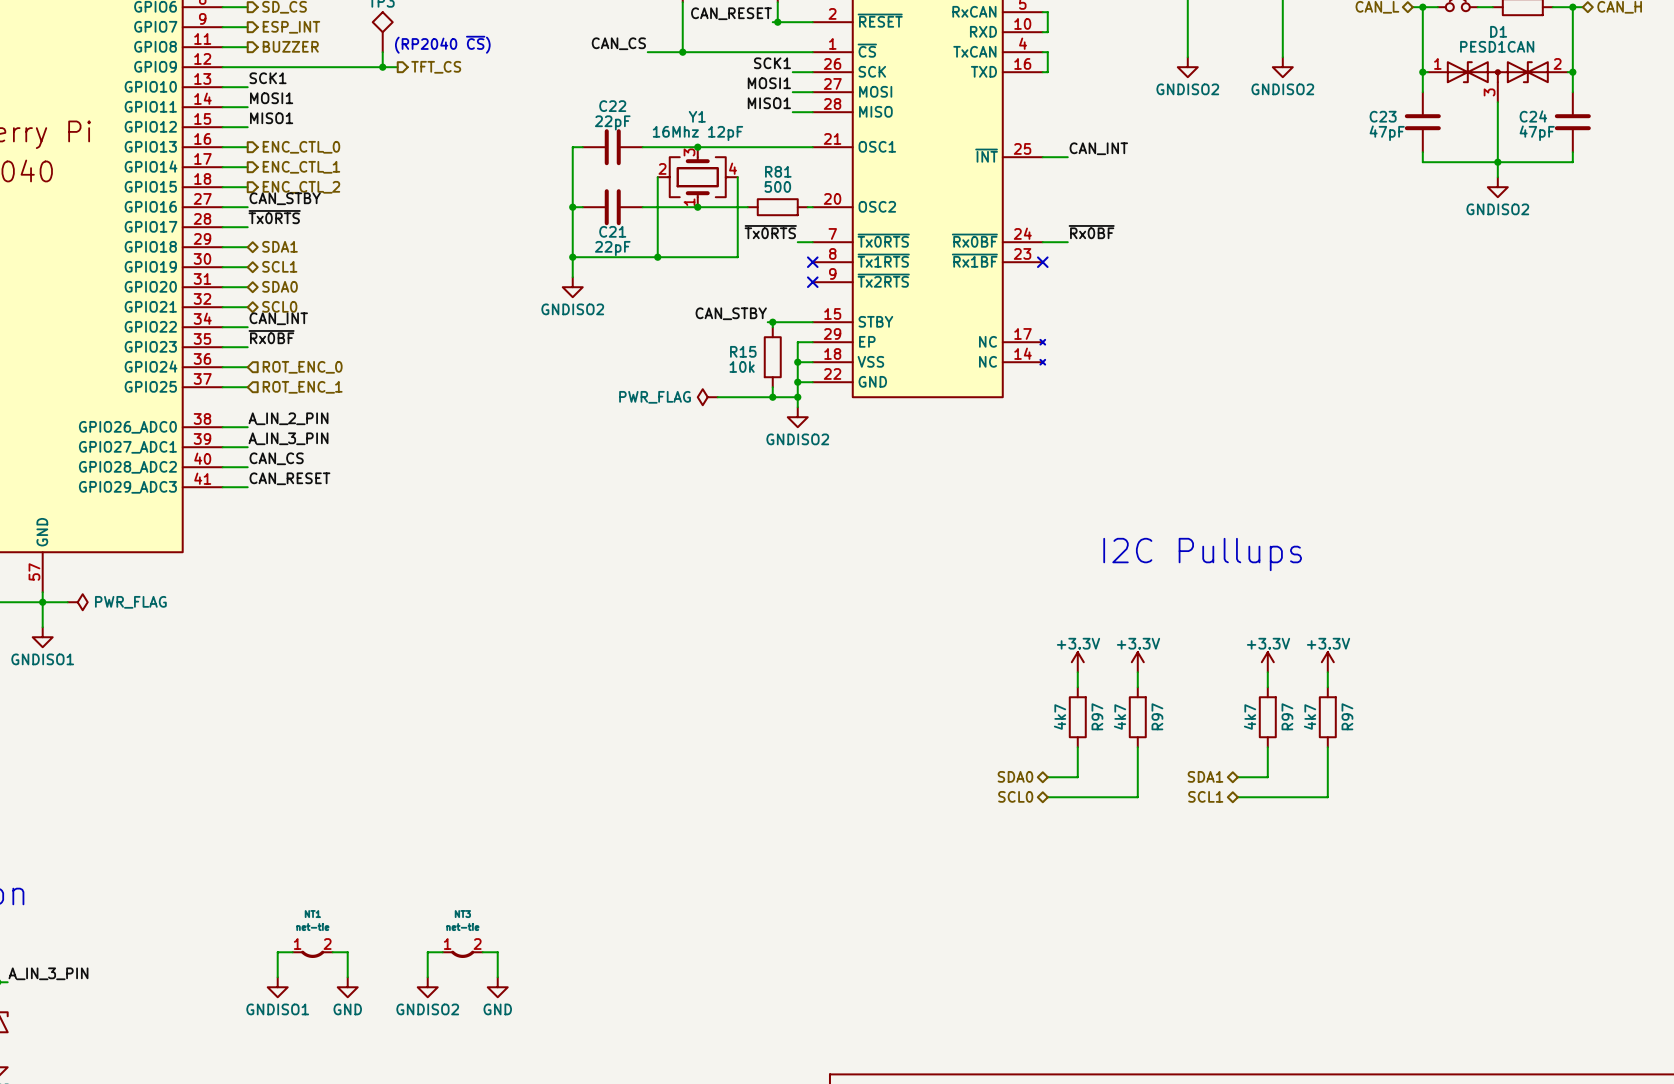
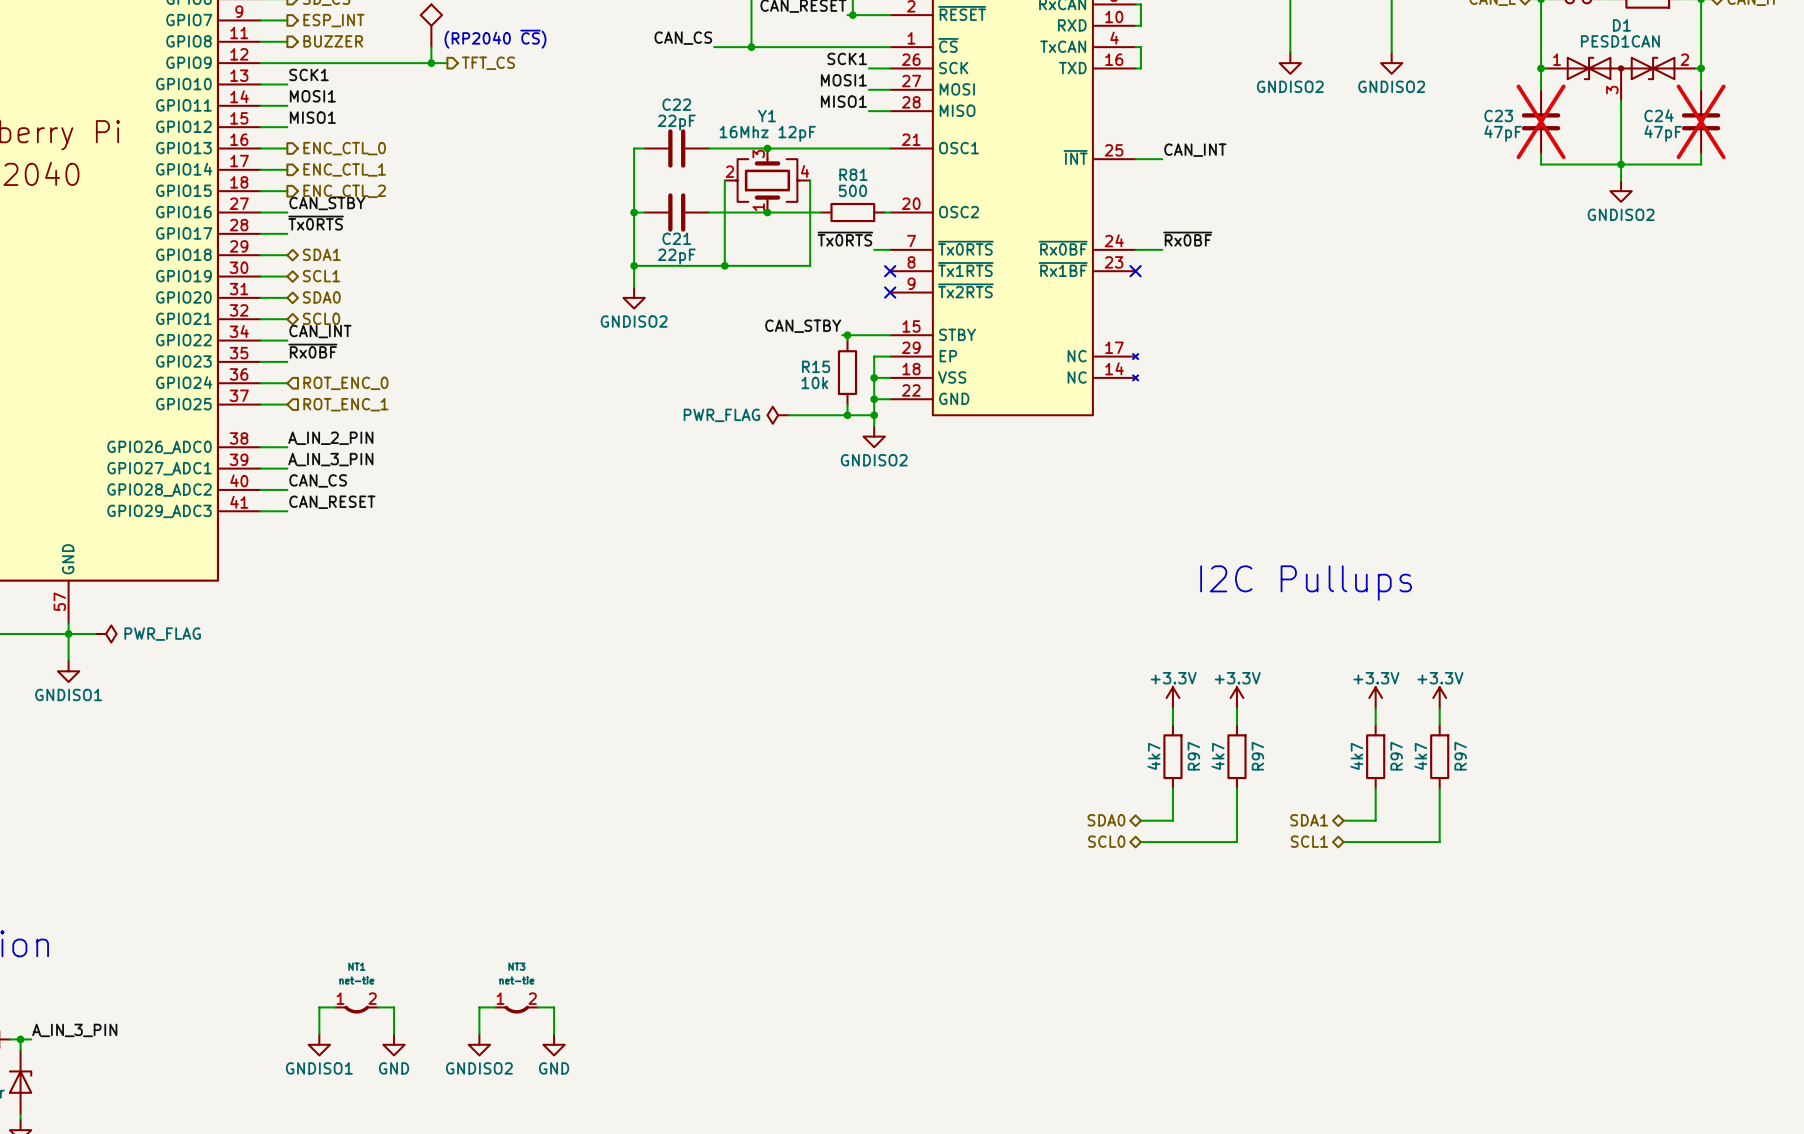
C23 do-not-place cross: none -> (1541, 121)
C24 do-not-place cross: none -> (1701, 121)

